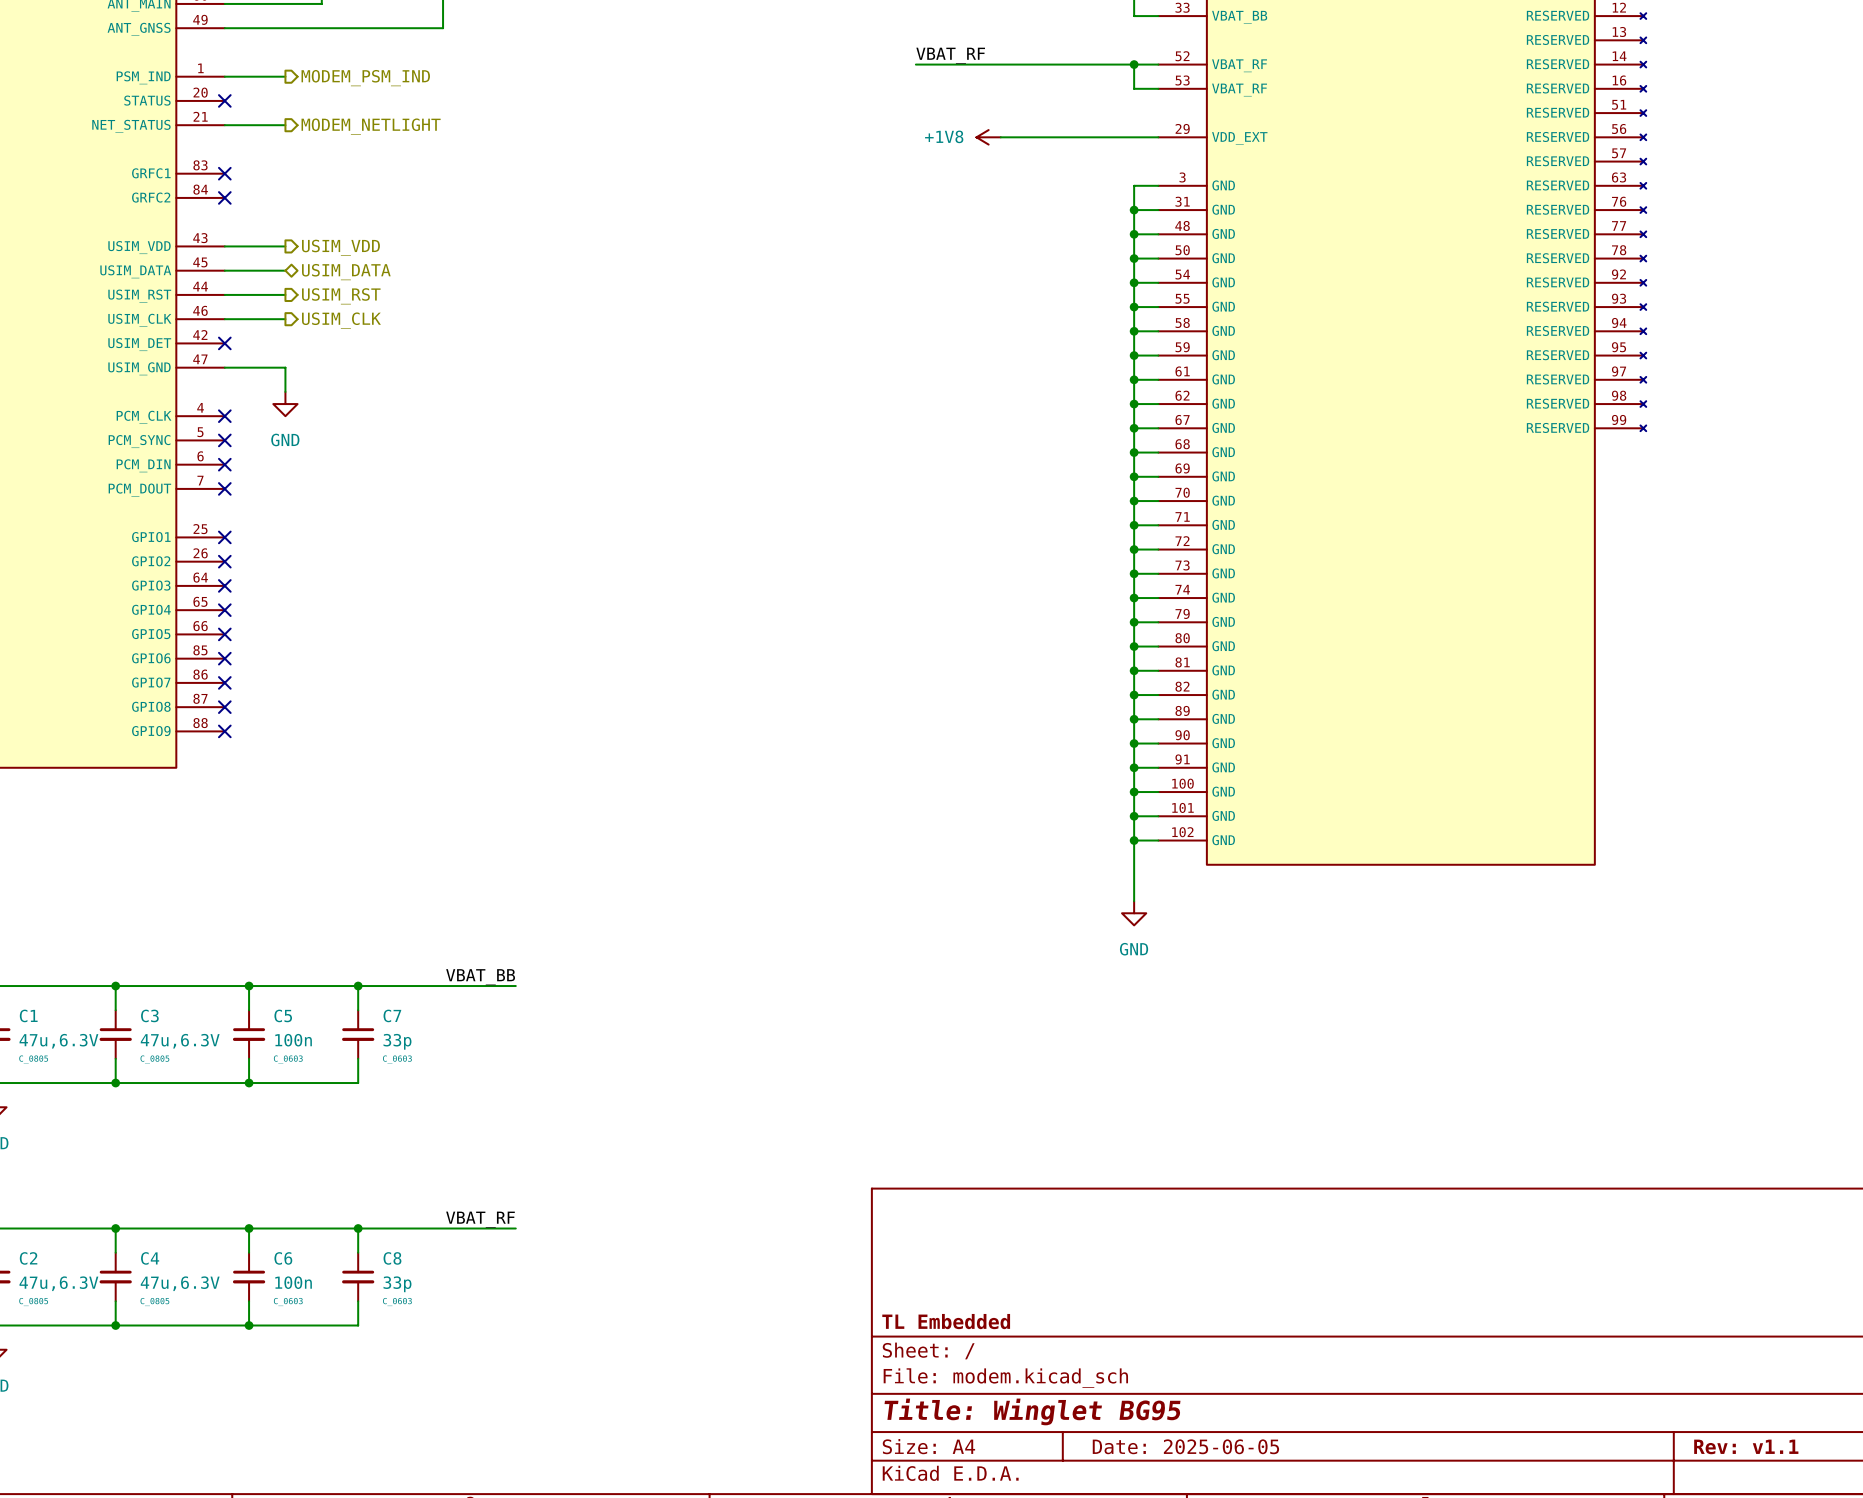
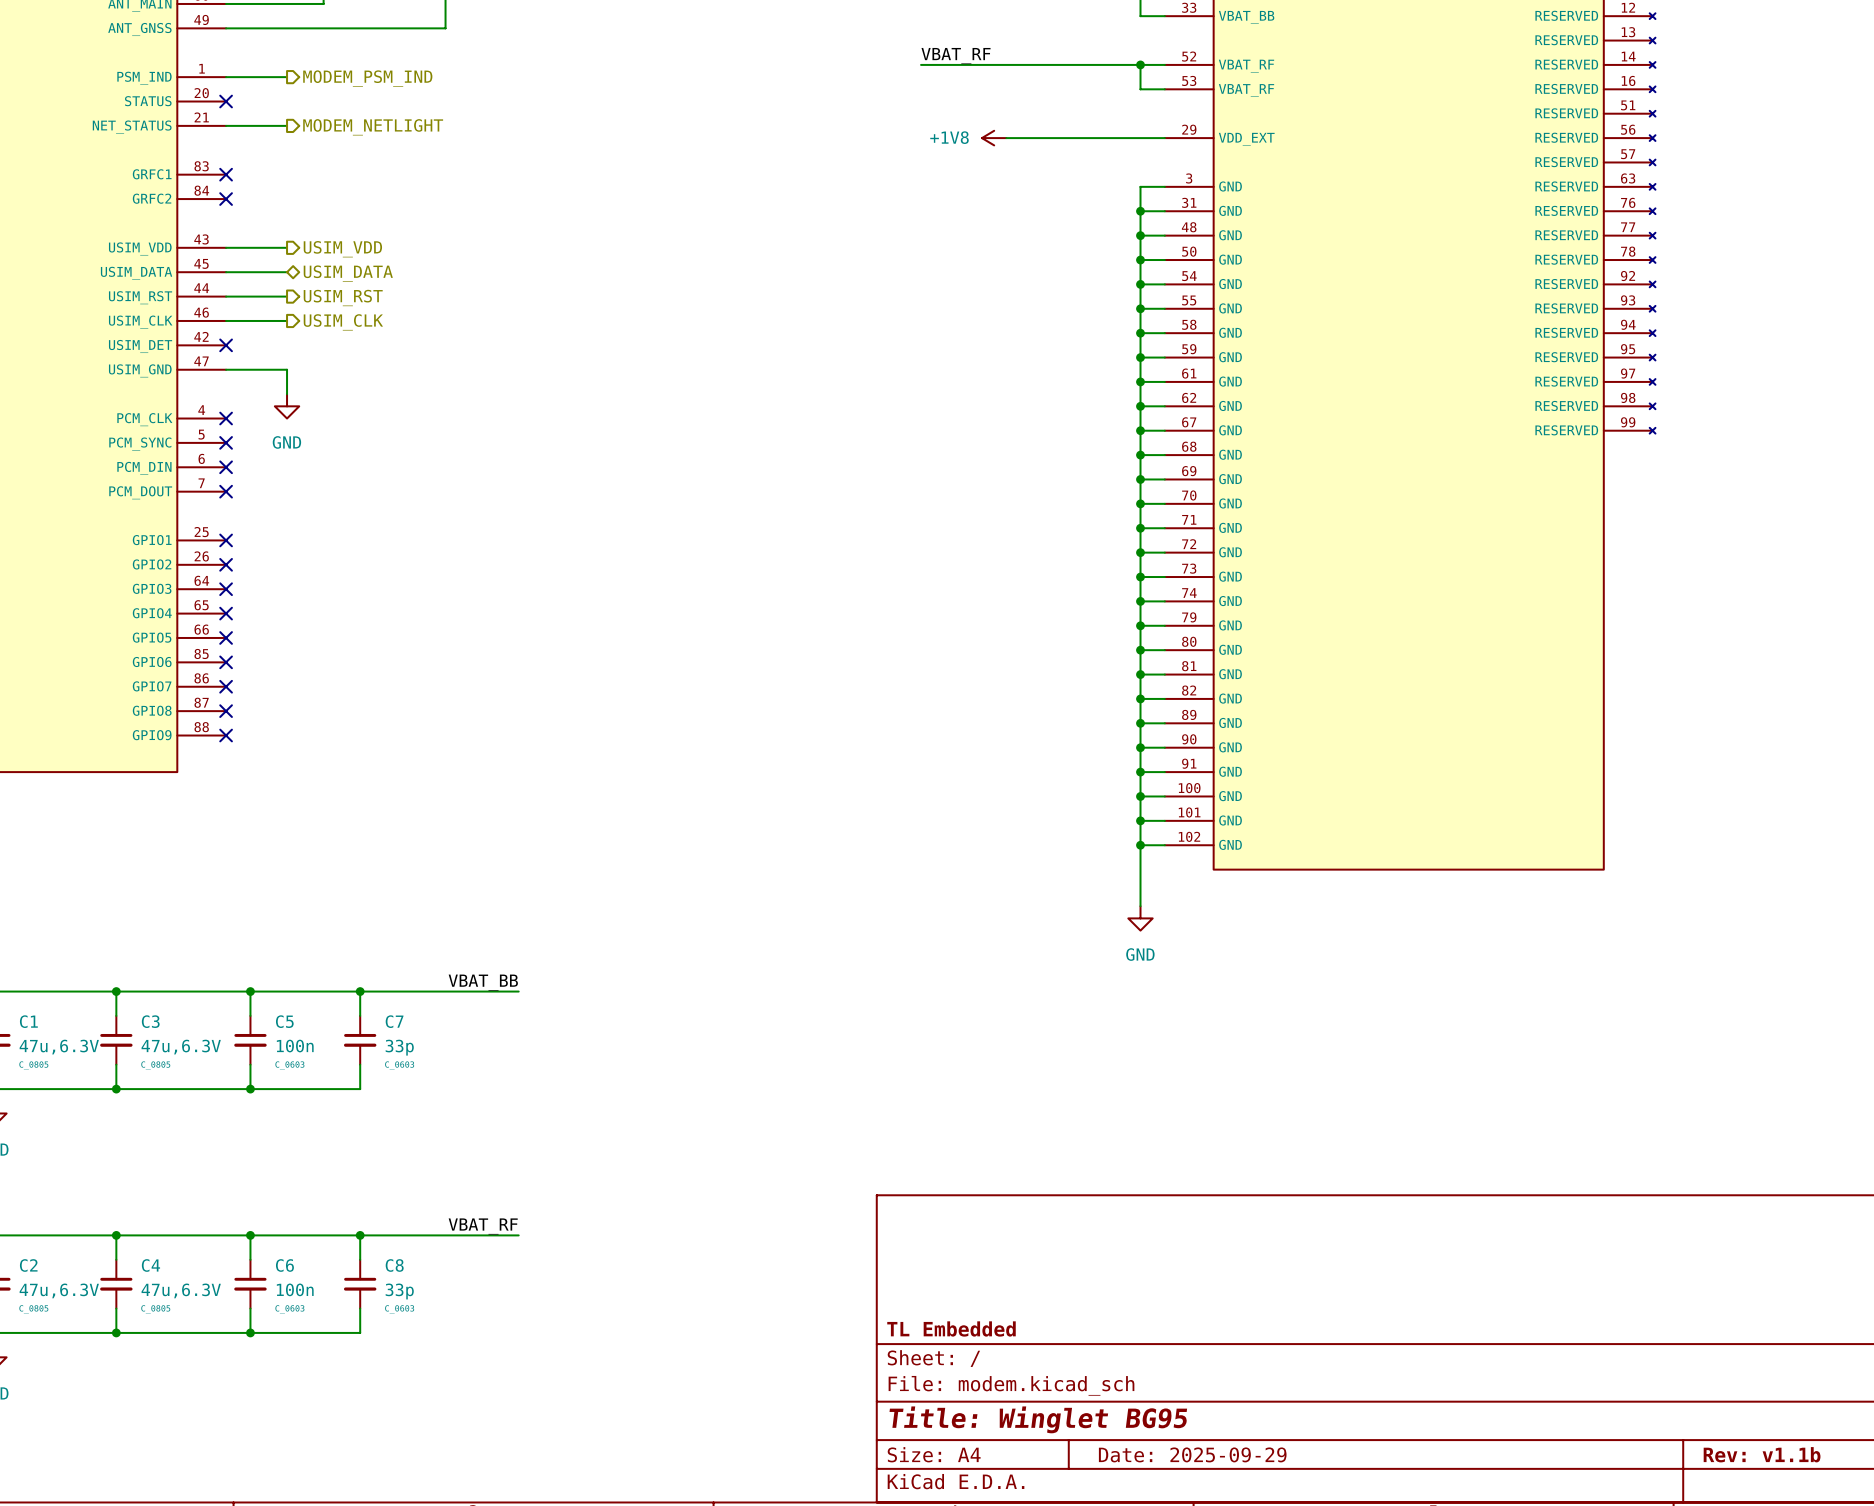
title block: Date: 2025-06-05 (1185, 1446) -> Date: 2025-09-29 (1192, 1454)
title block: Rev: v1.1 (1746, 1446) -> Rev: v1.1b (1762, 1454)

